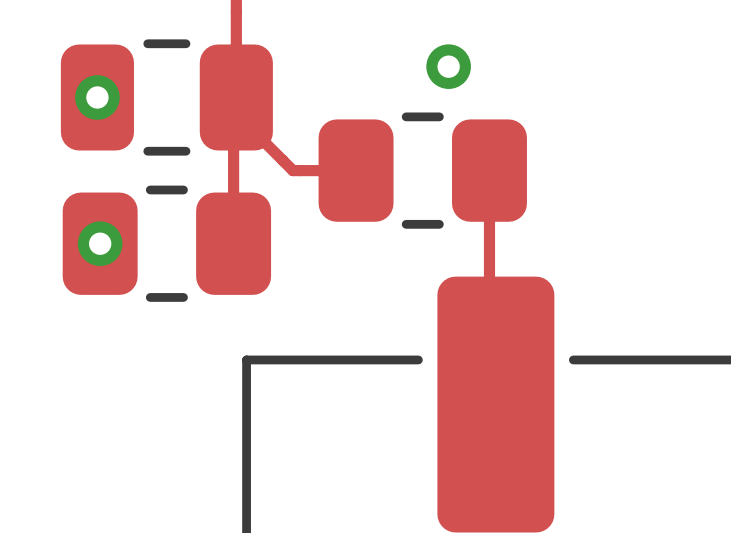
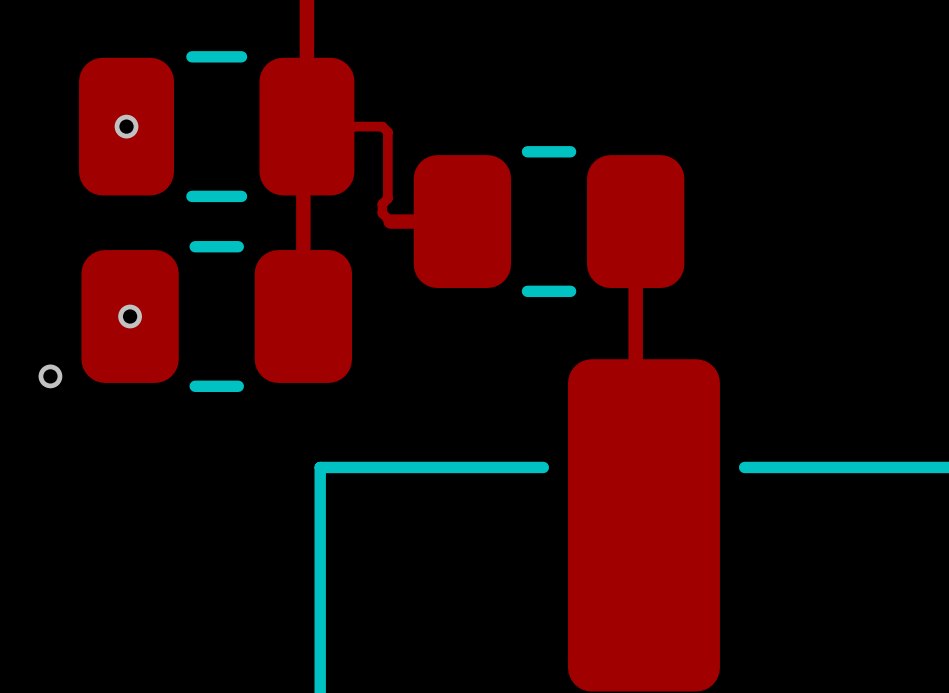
via: (448, 66) -> none
via size: [75, 75, 120, 120] -> [114, 114, 139, 139]
track: (236, 113) (292, 170) (300, 170) -> (306, 126) (382, 126) (387, 132) (387, 198) (382, 204) (382, 213) (390, 221)
via size: [77, 221, 123, 267] -> [118, 304, 142, 329]
via: none -> (50, 376)

